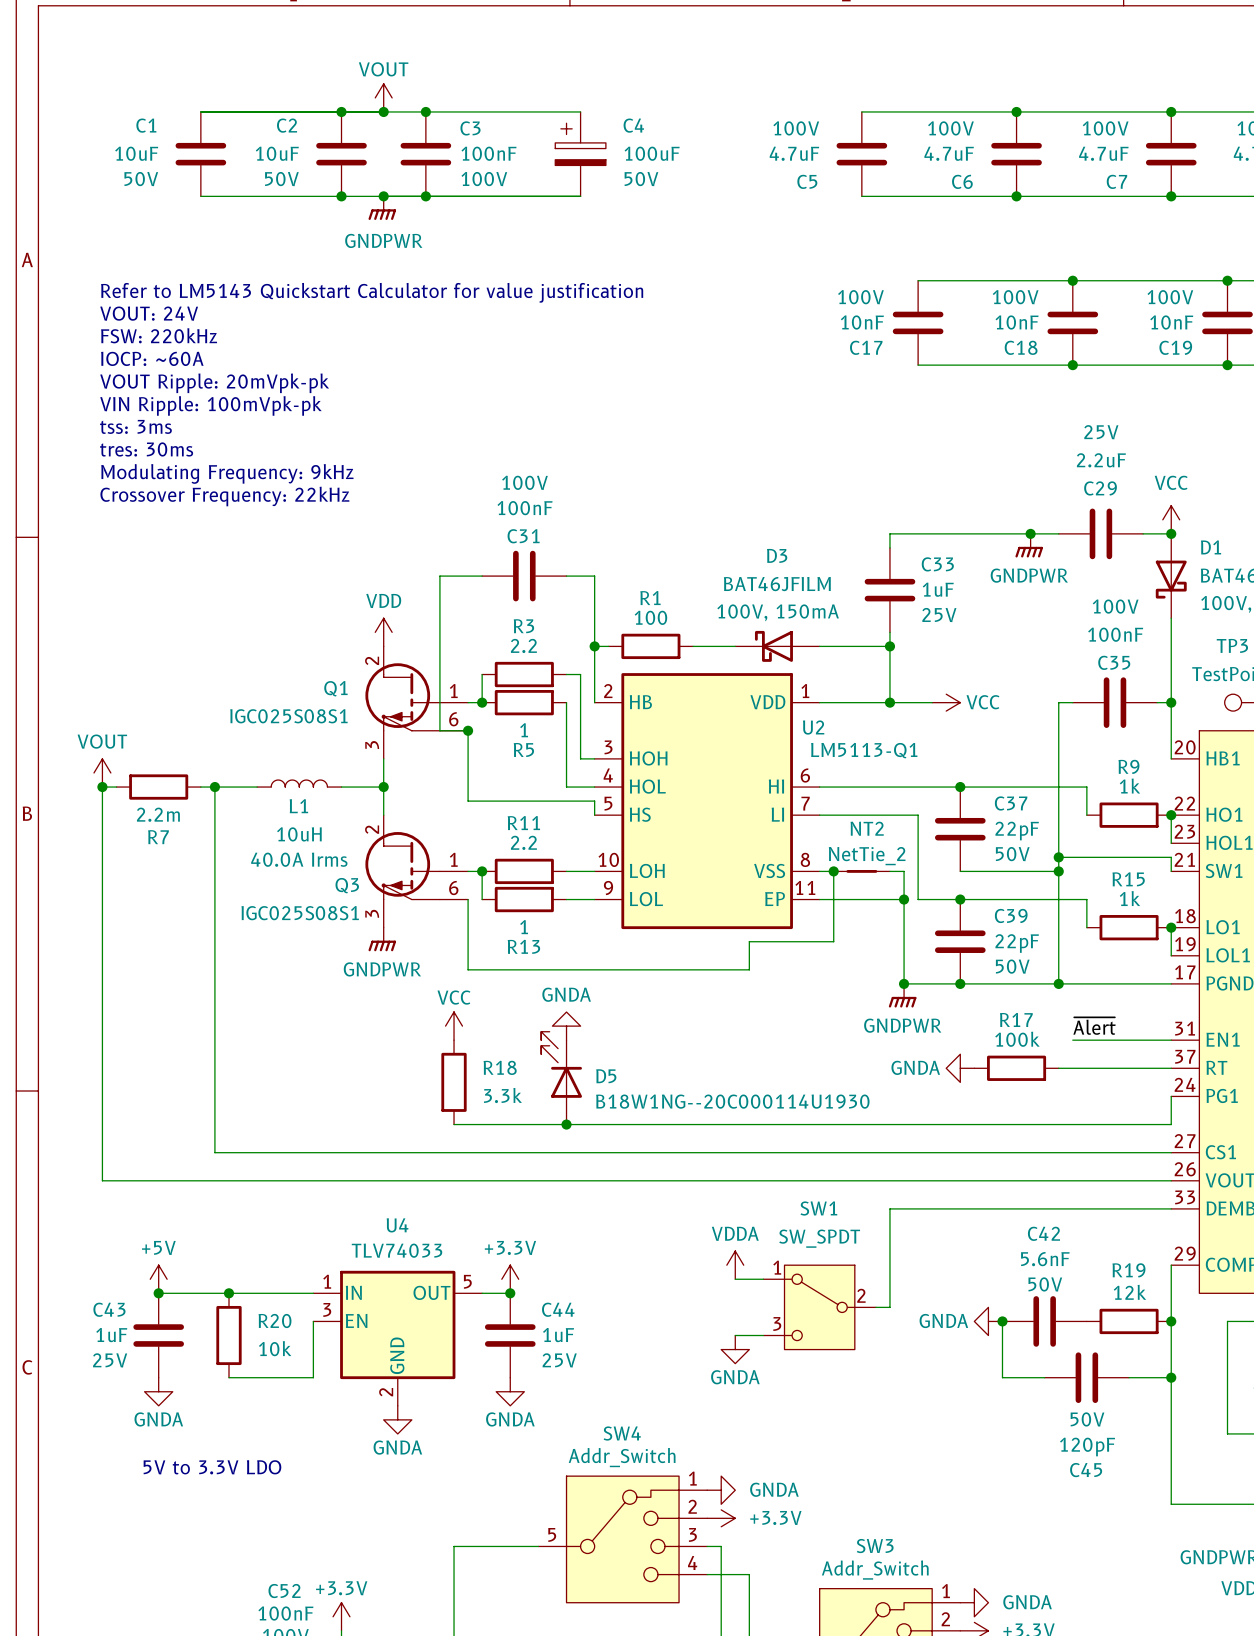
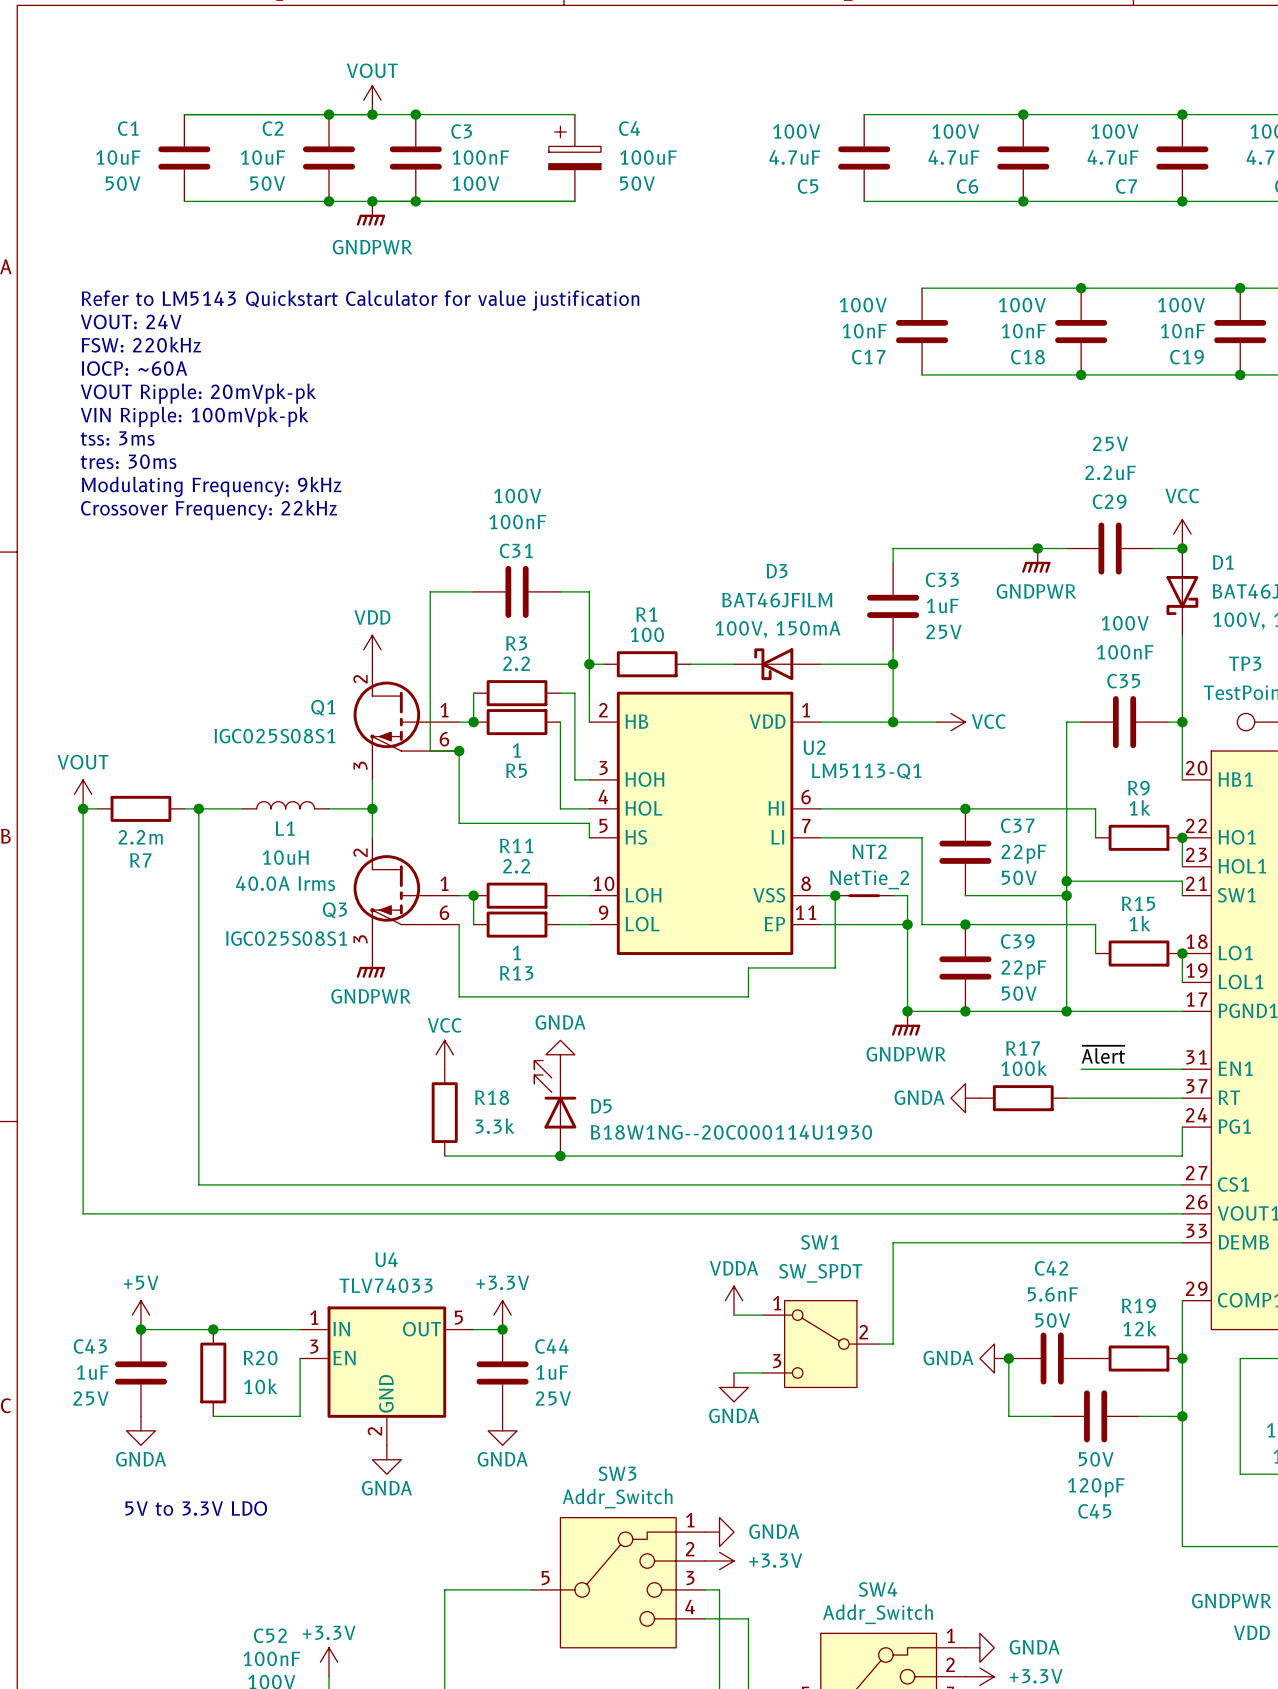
SW4 name: SW4 (622, 1433) -> SW3 (617, 1473)
SW3 name: SW3 (875, 1546) -> SW4 (878, 1589)

